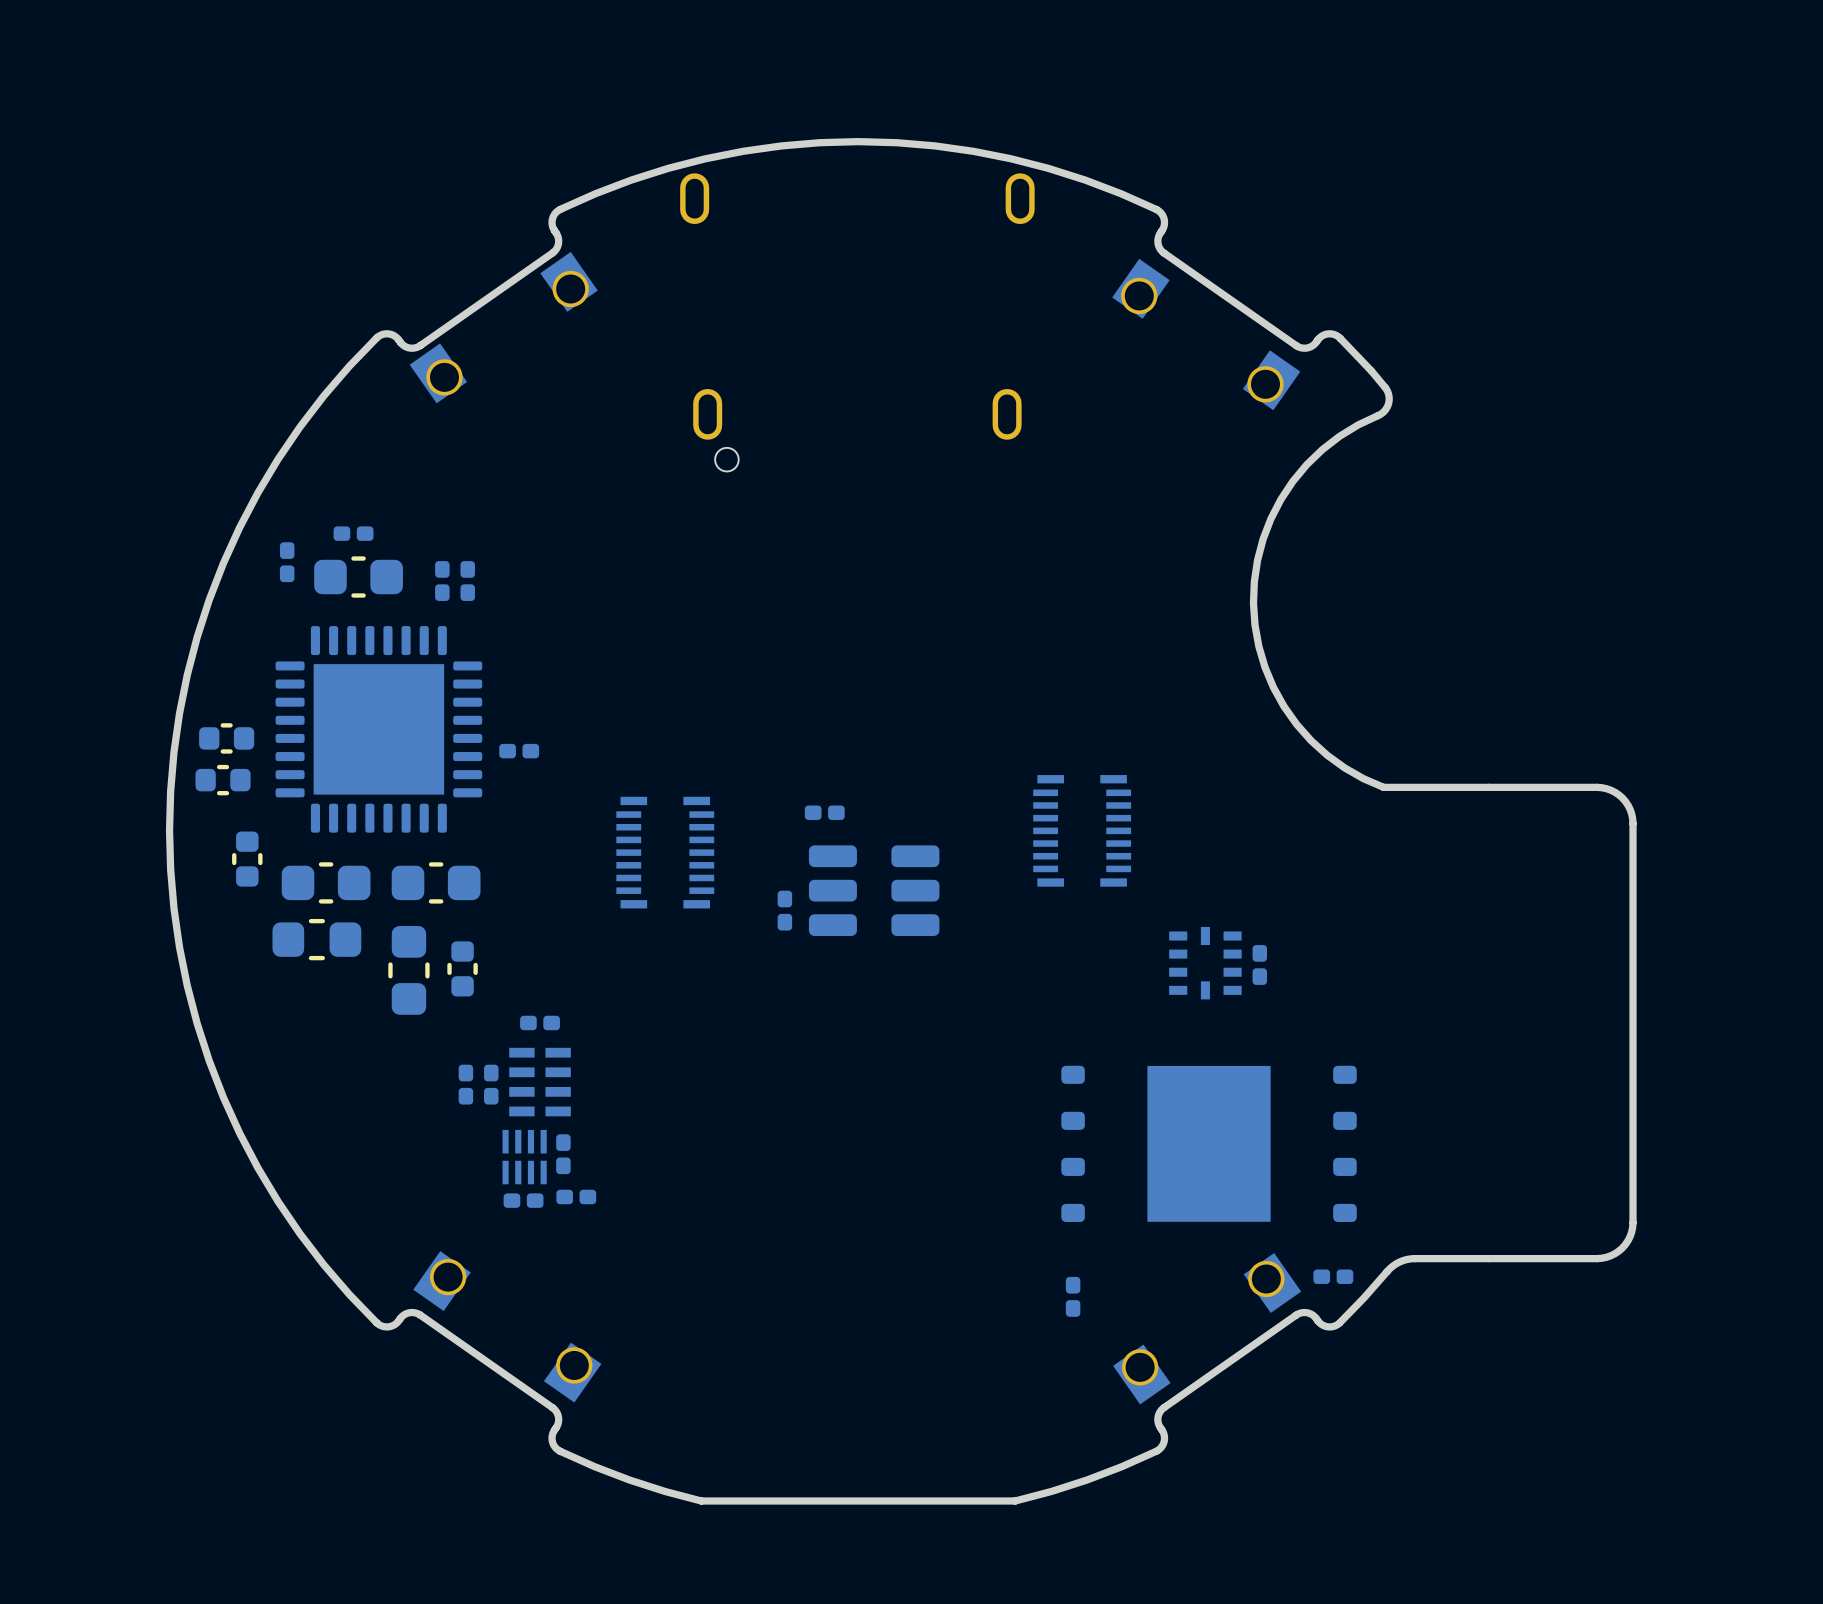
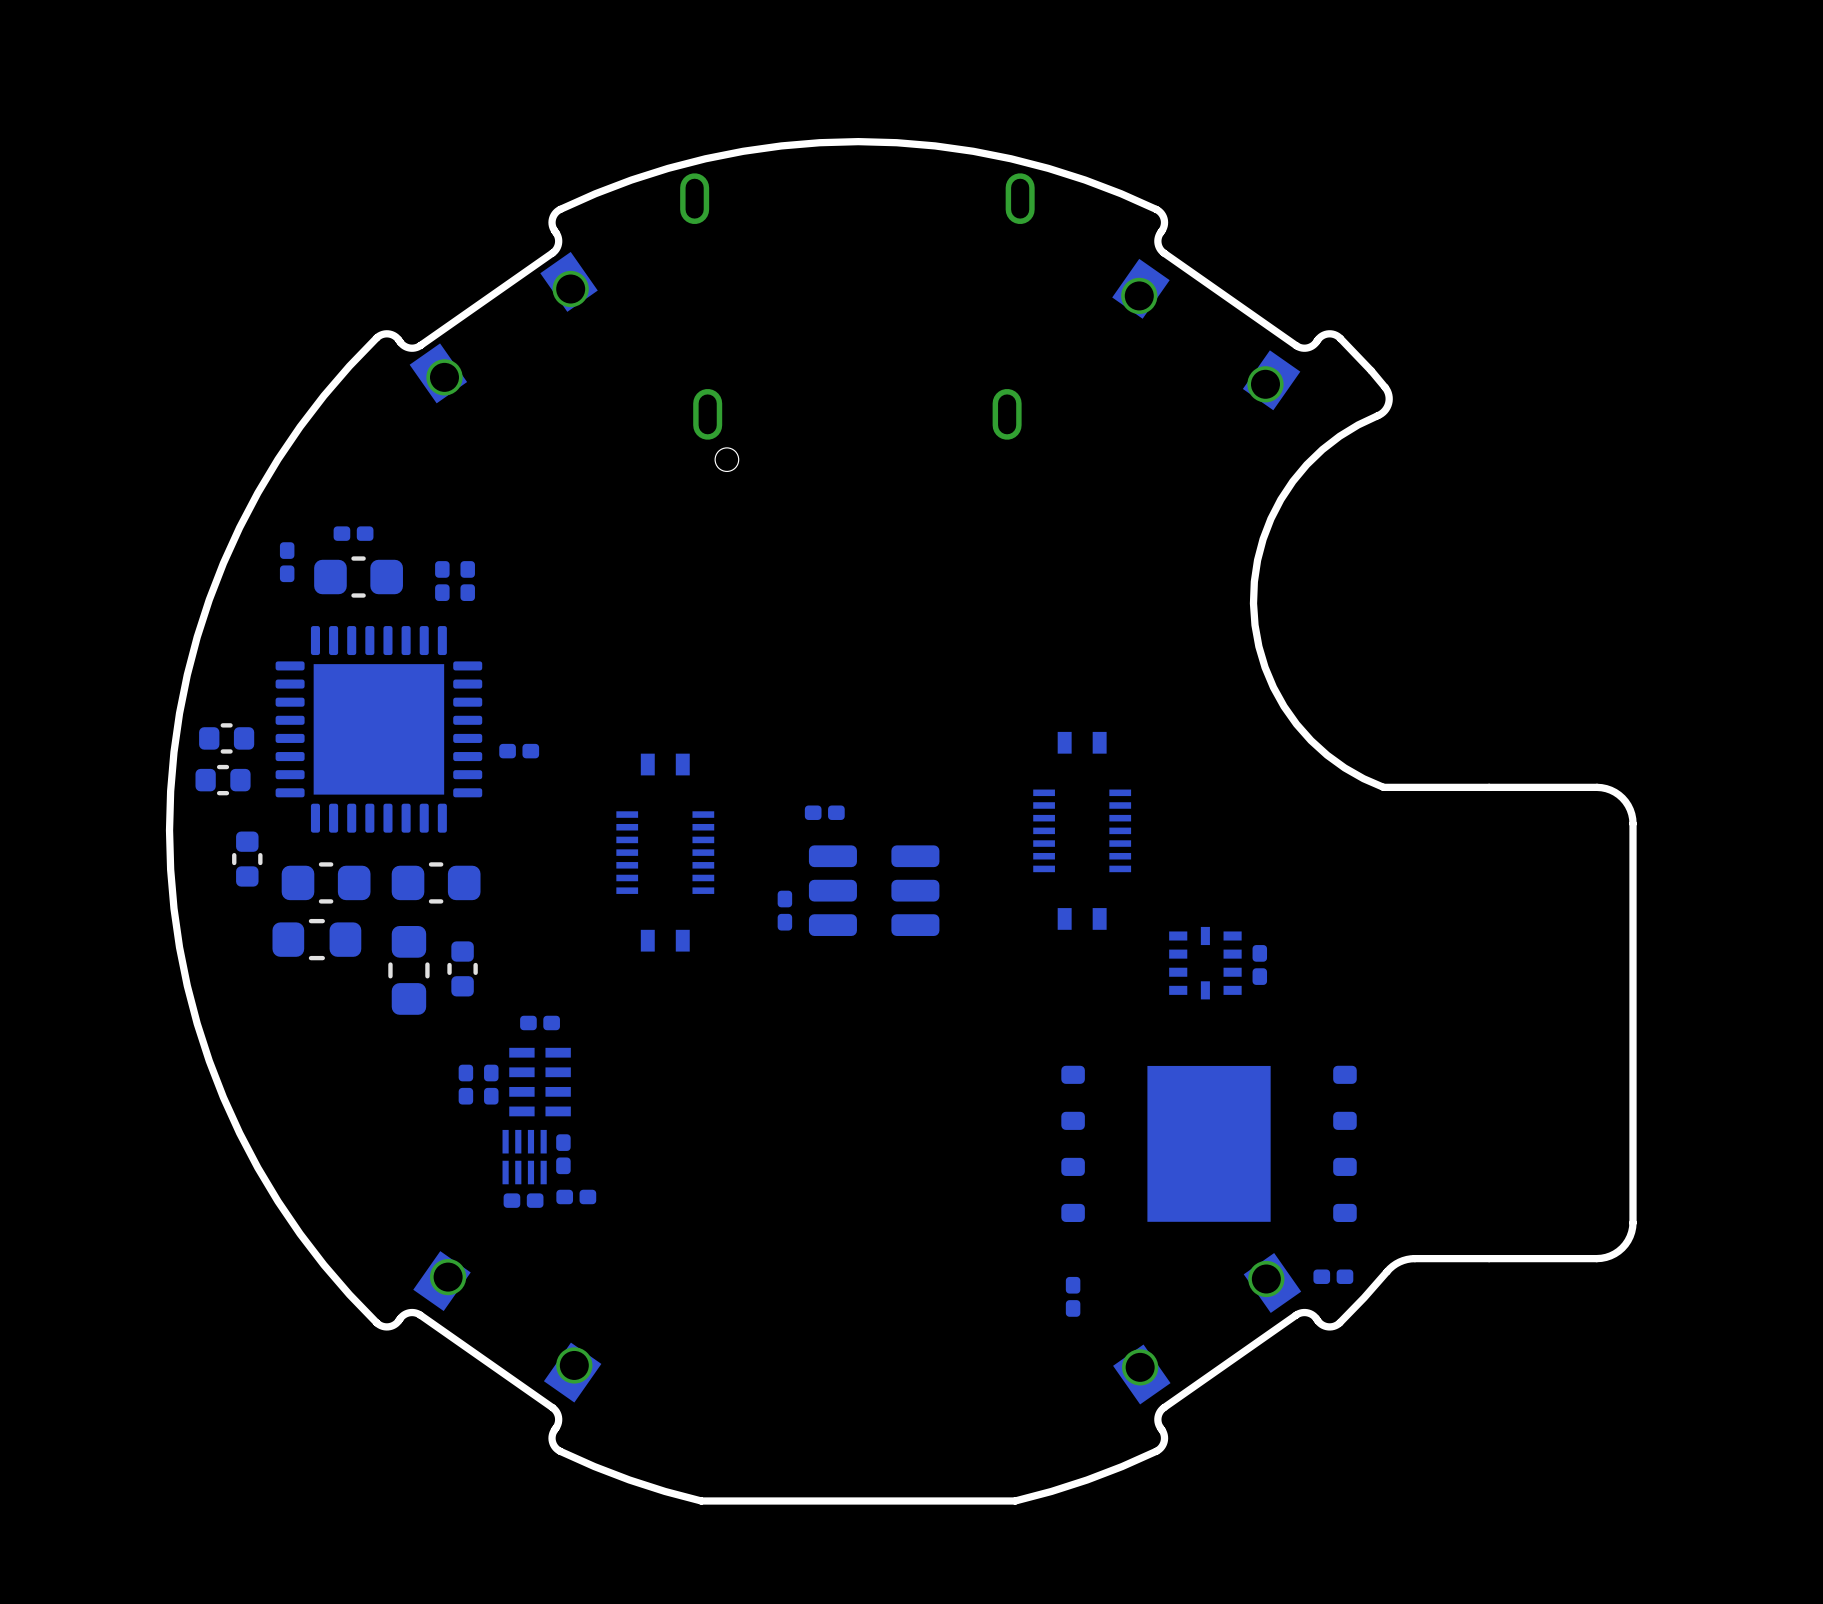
part footprint: [1033, 775, 1132, 887] -> [1033, 731, 1132, 930]
part footprint: [616, 796, 715, 909] -> [616, 753, 715, 952]

